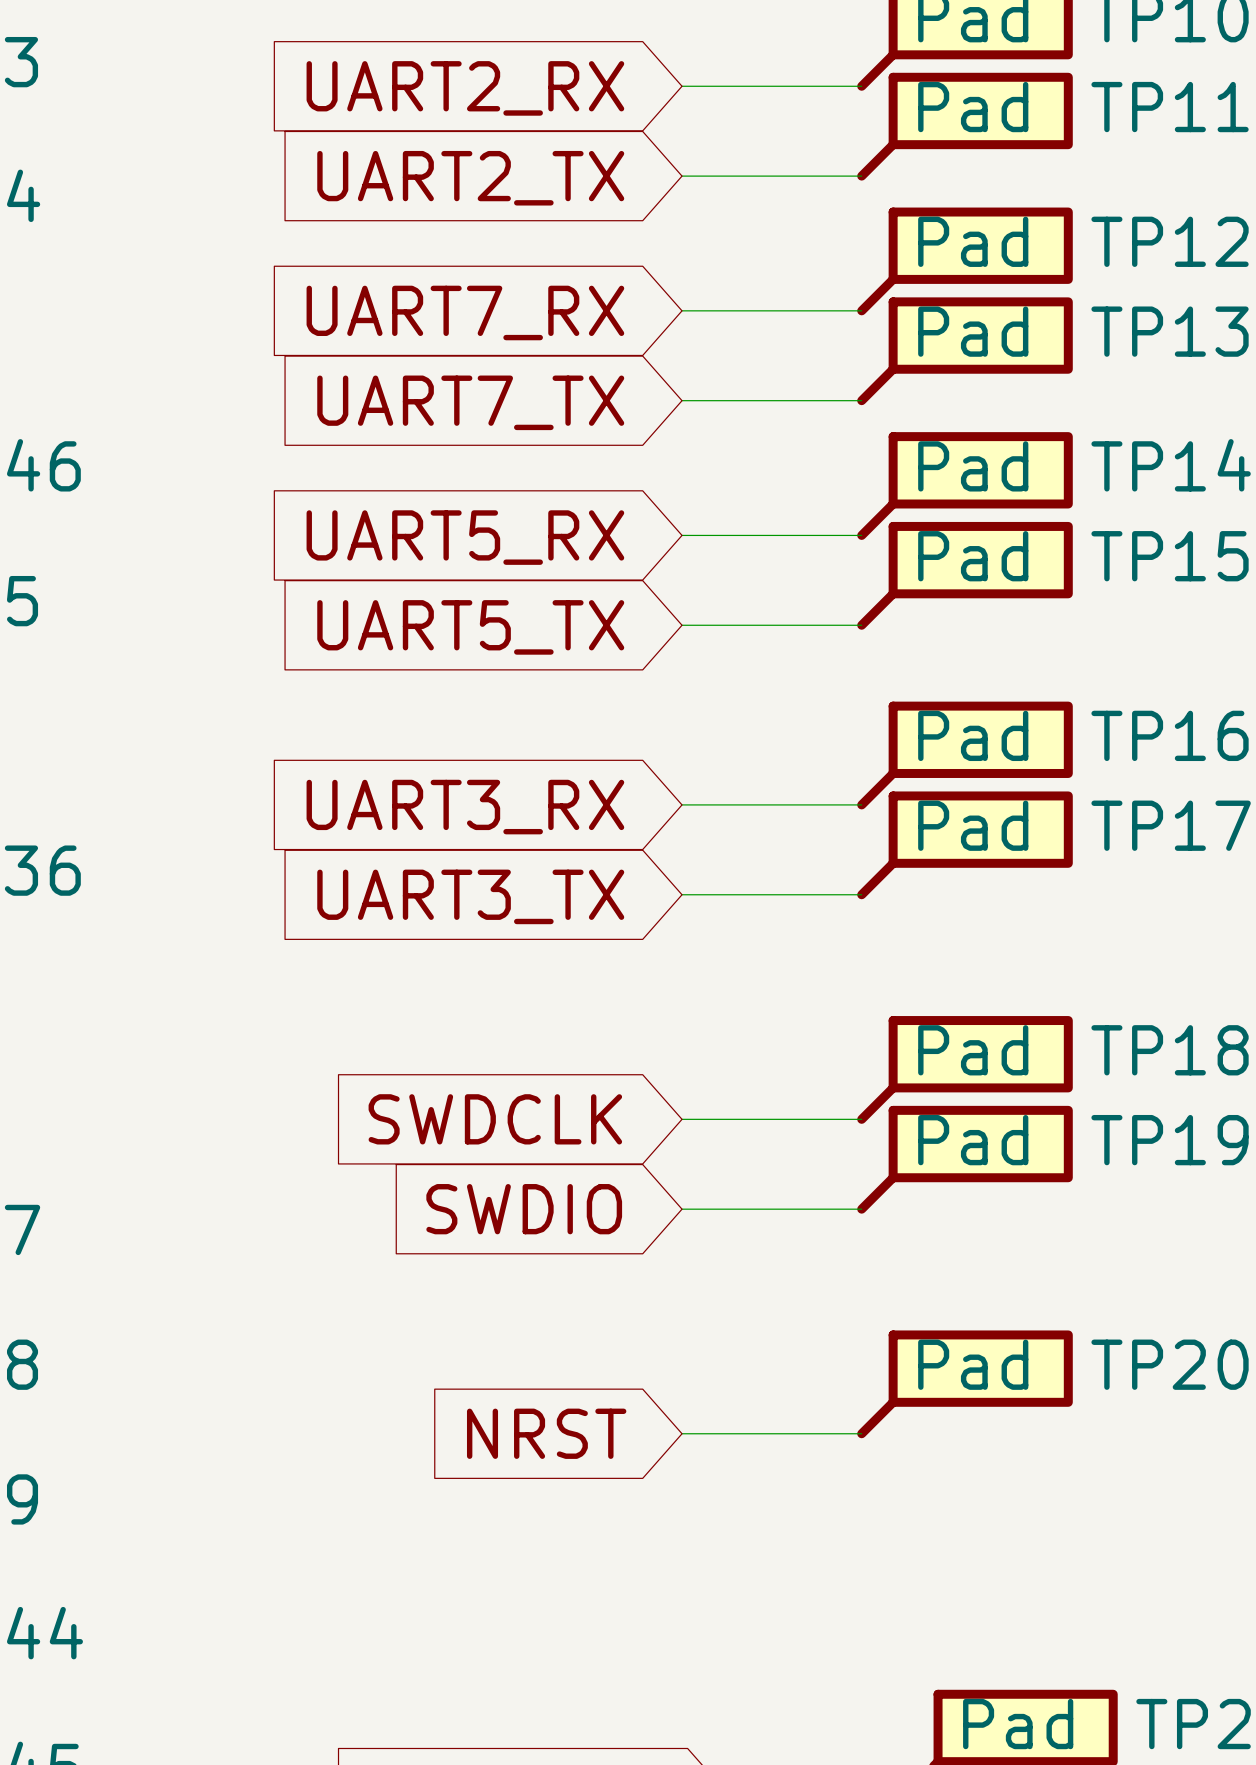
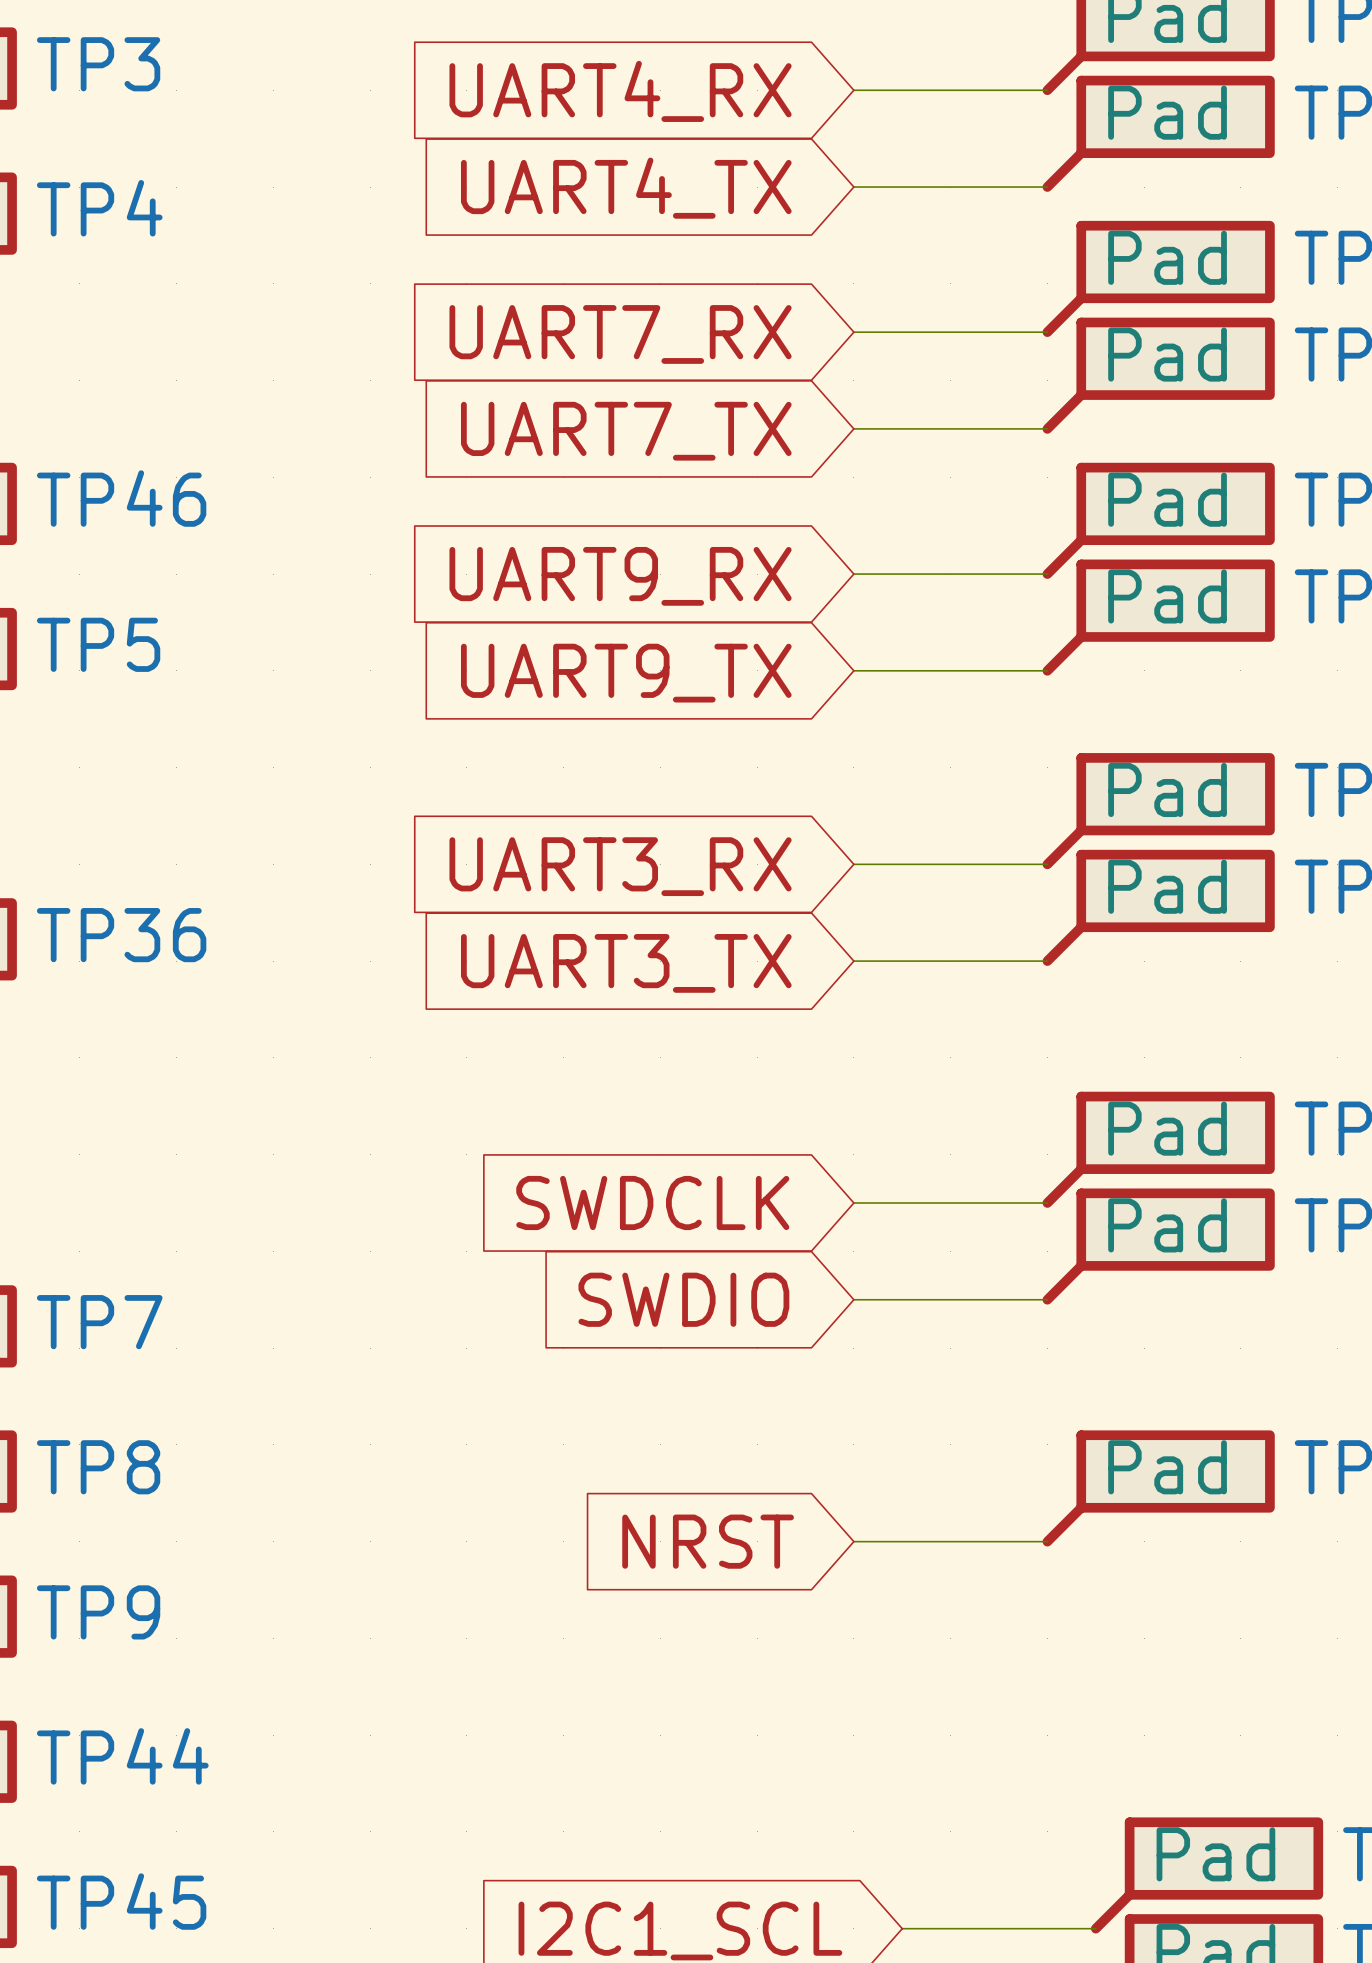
global label: UART2_RX (465, 88) -> UART4_RX (620, 91)
global label: UART2_TX (470, 178) -> UART4_TX (626, 188)
global label: UART5_RX (465, 537) -> UART9_RX (620, 576)
global label: UART5_TX (470, 627) -> UART9_TX (626, 673)

